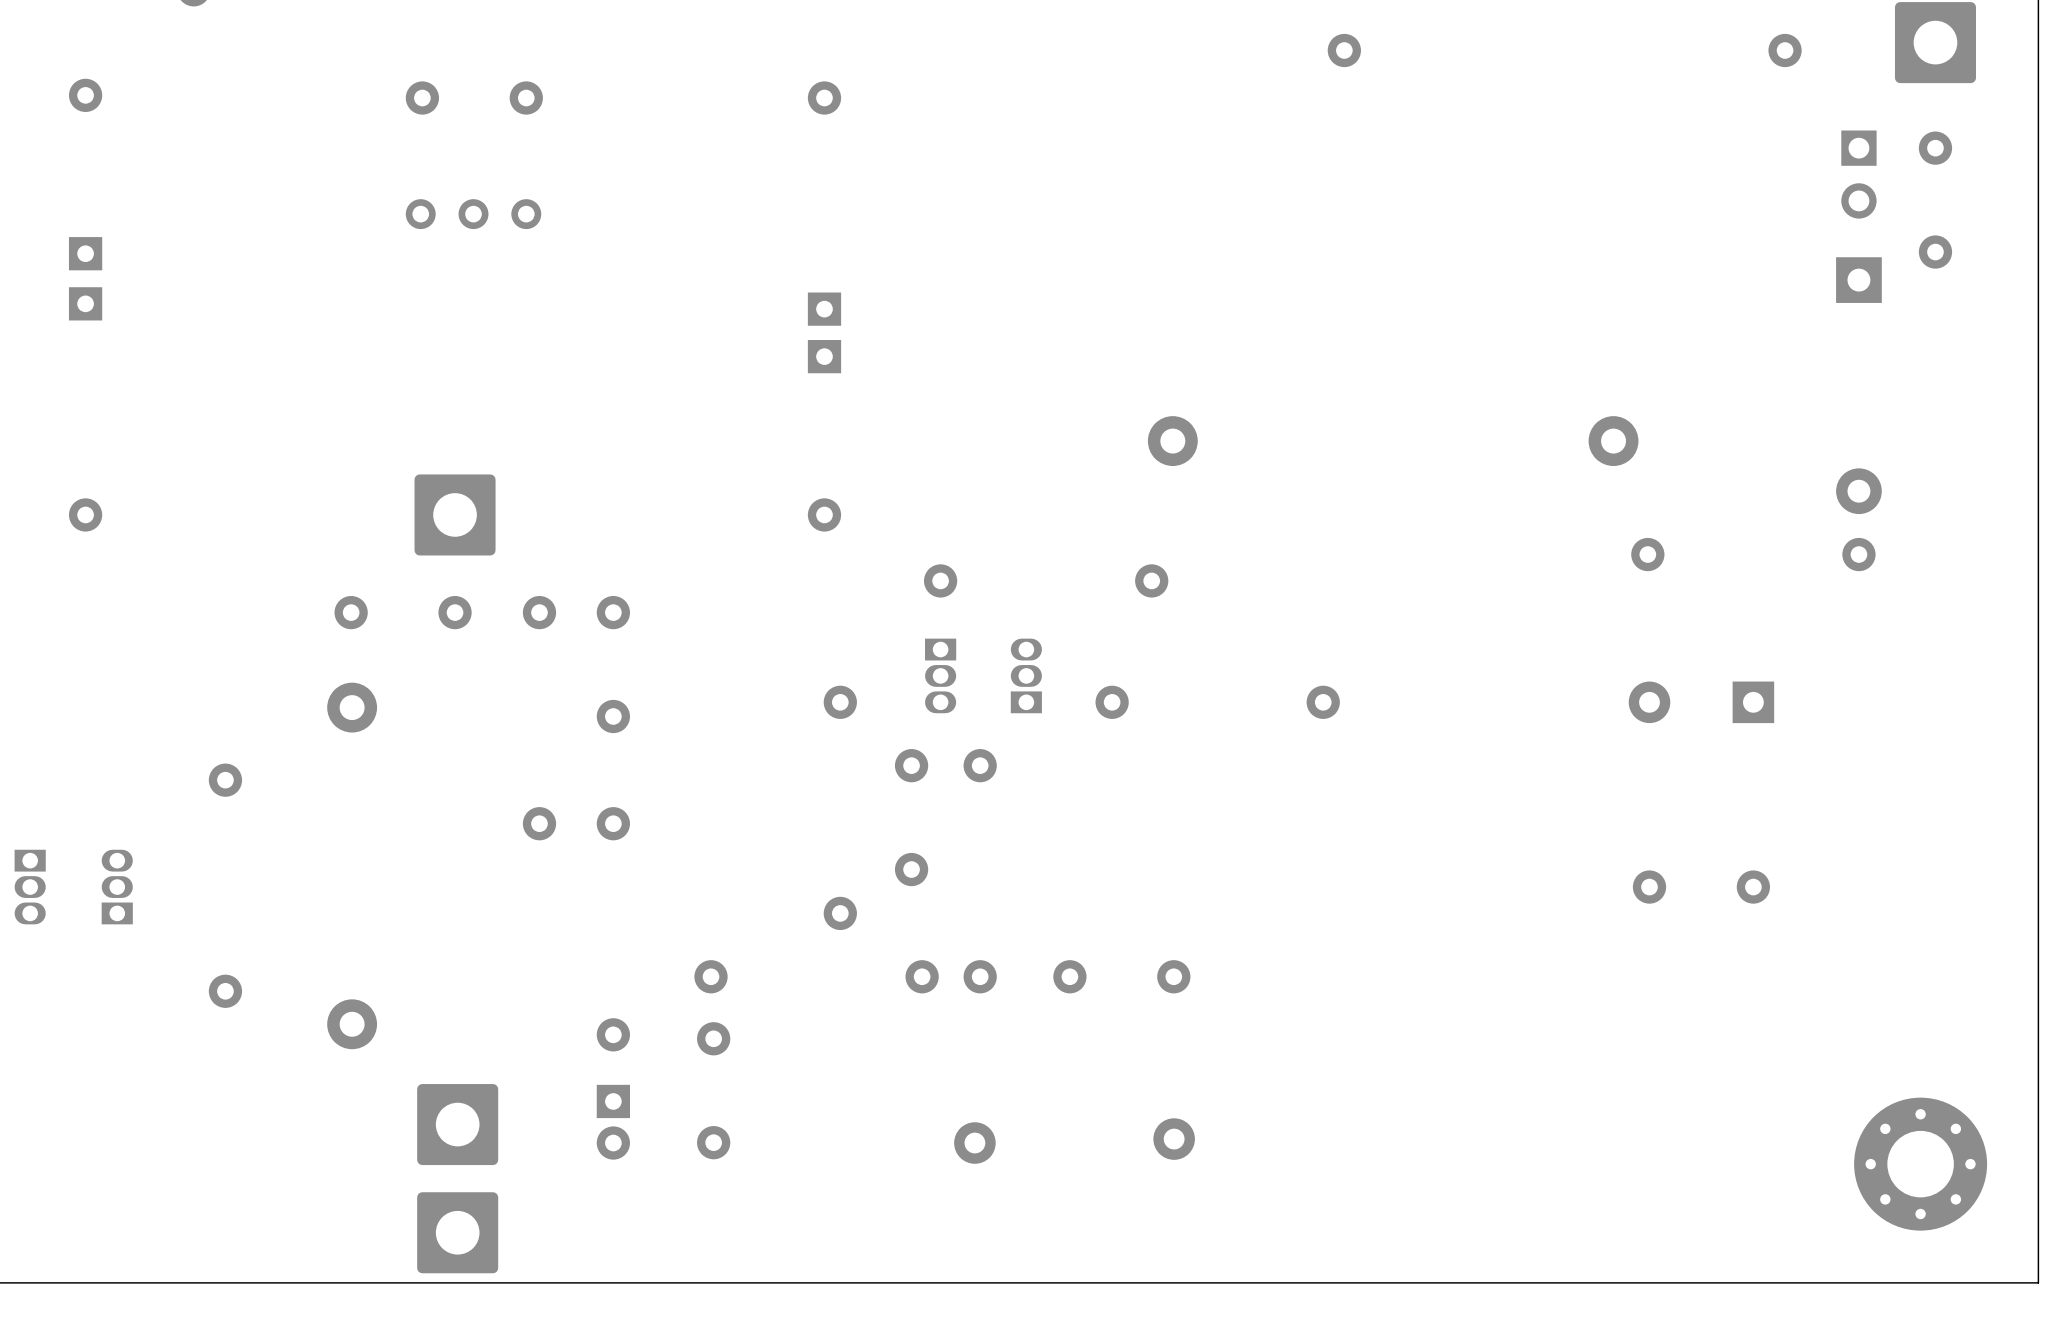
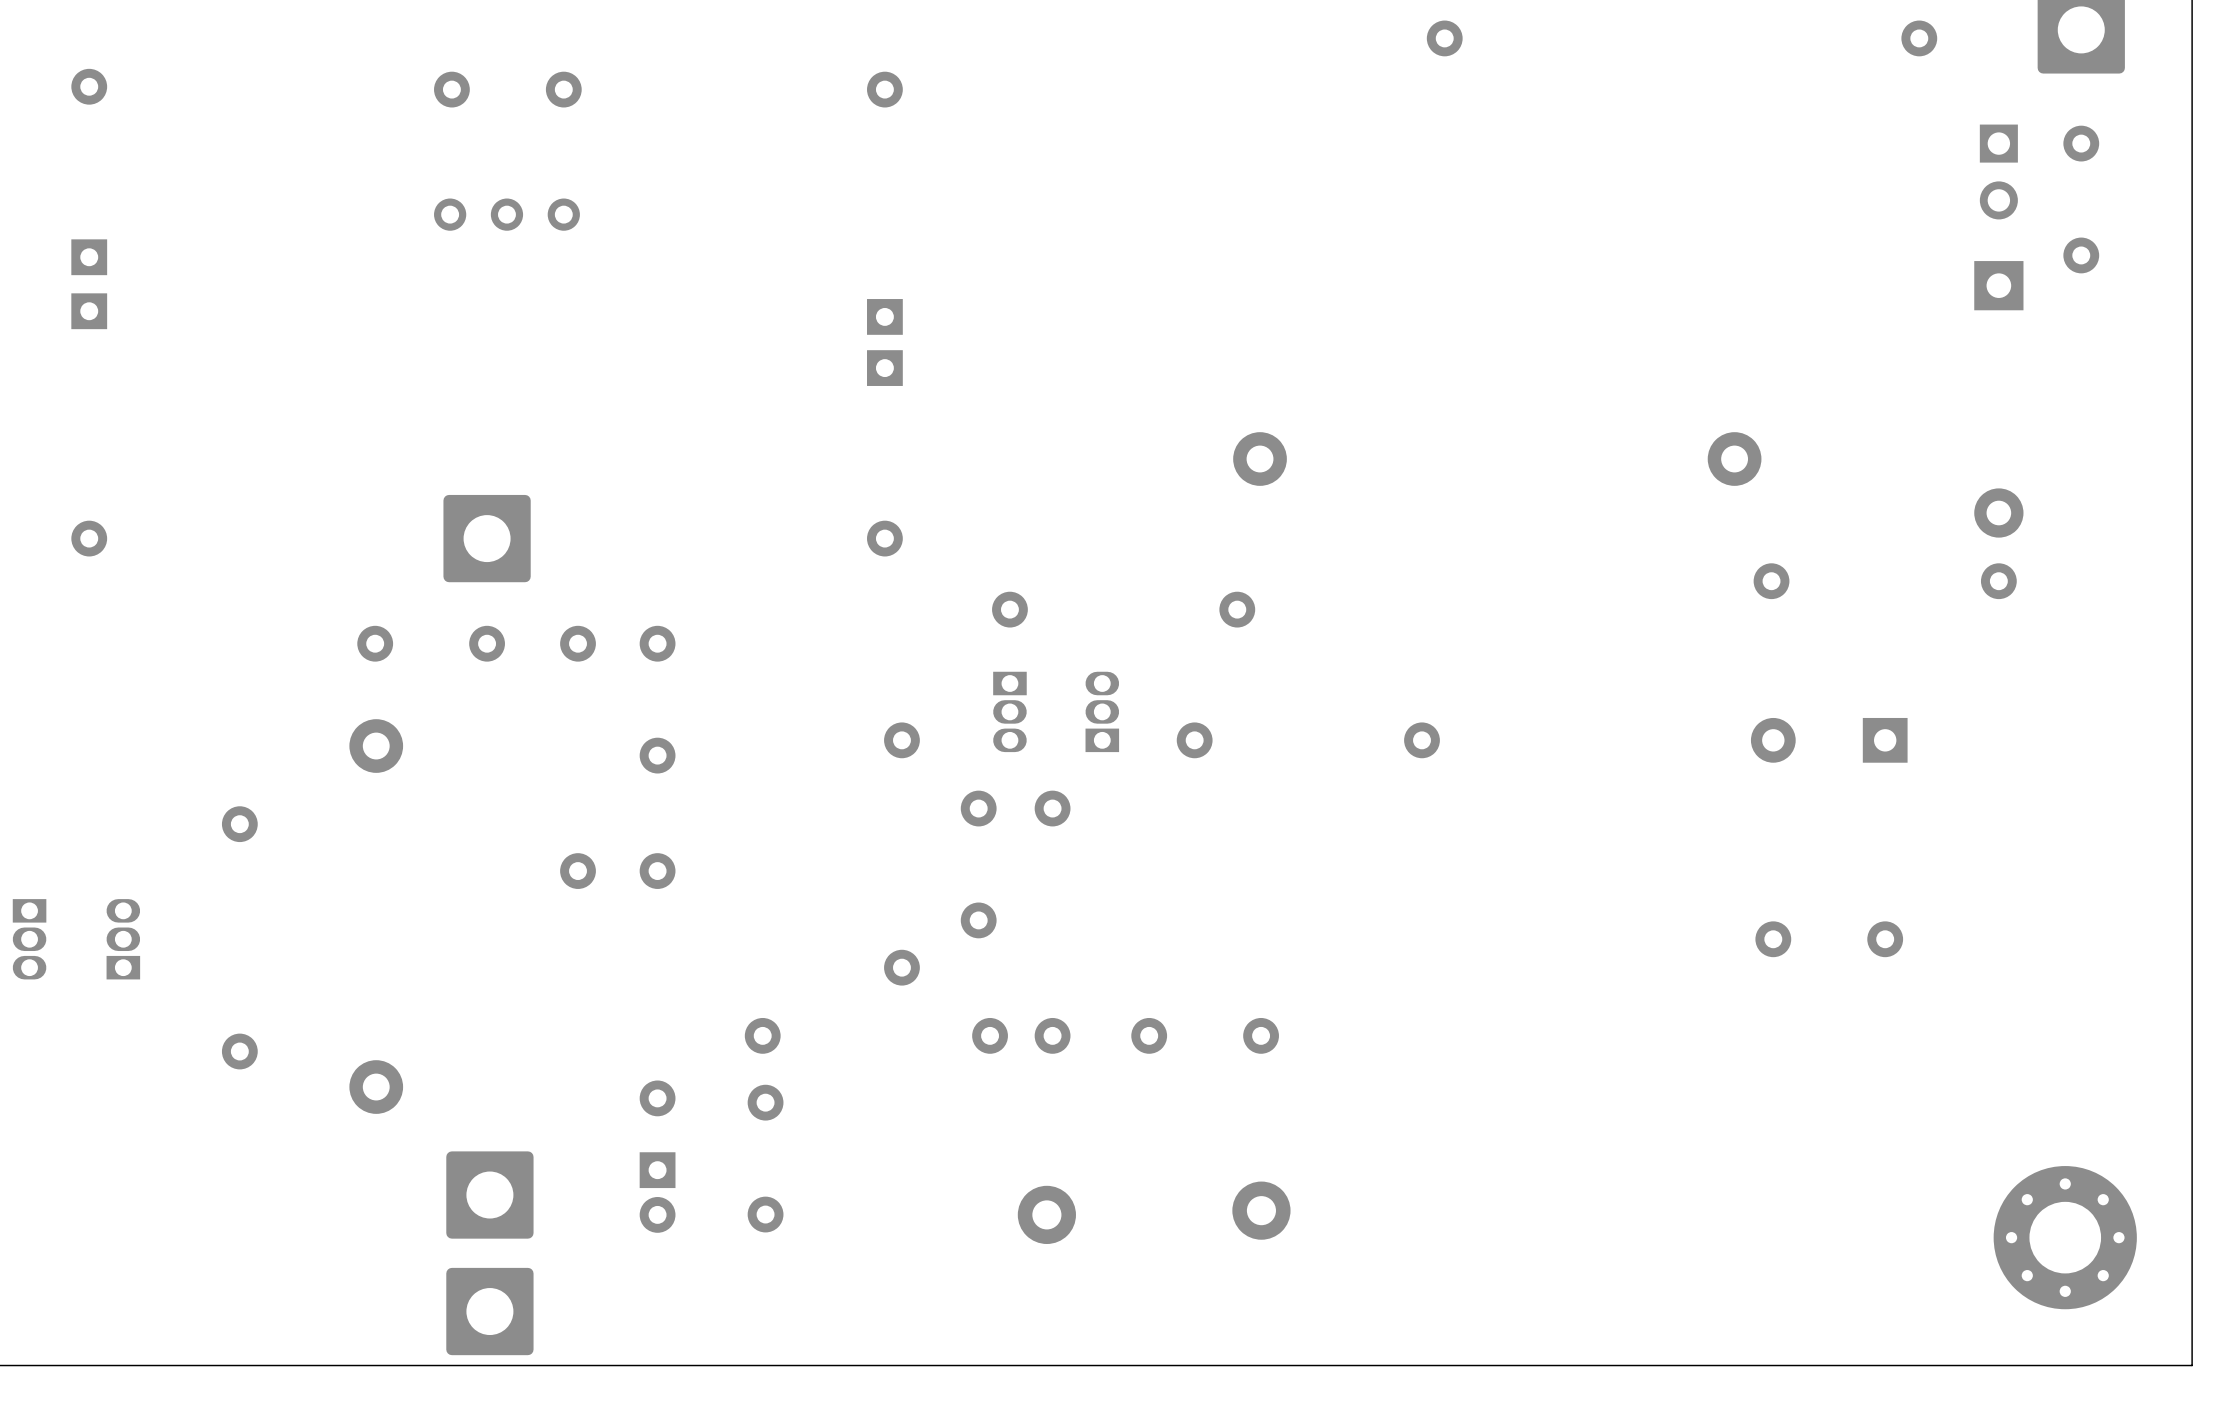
part footprint: [1153, 1118, 1195, 1160] -> [1232, 1181, 1291, 1240]
part footprint: [954, 1122, 996, 1164] -> [1017, 1185, 1076, 1244]

